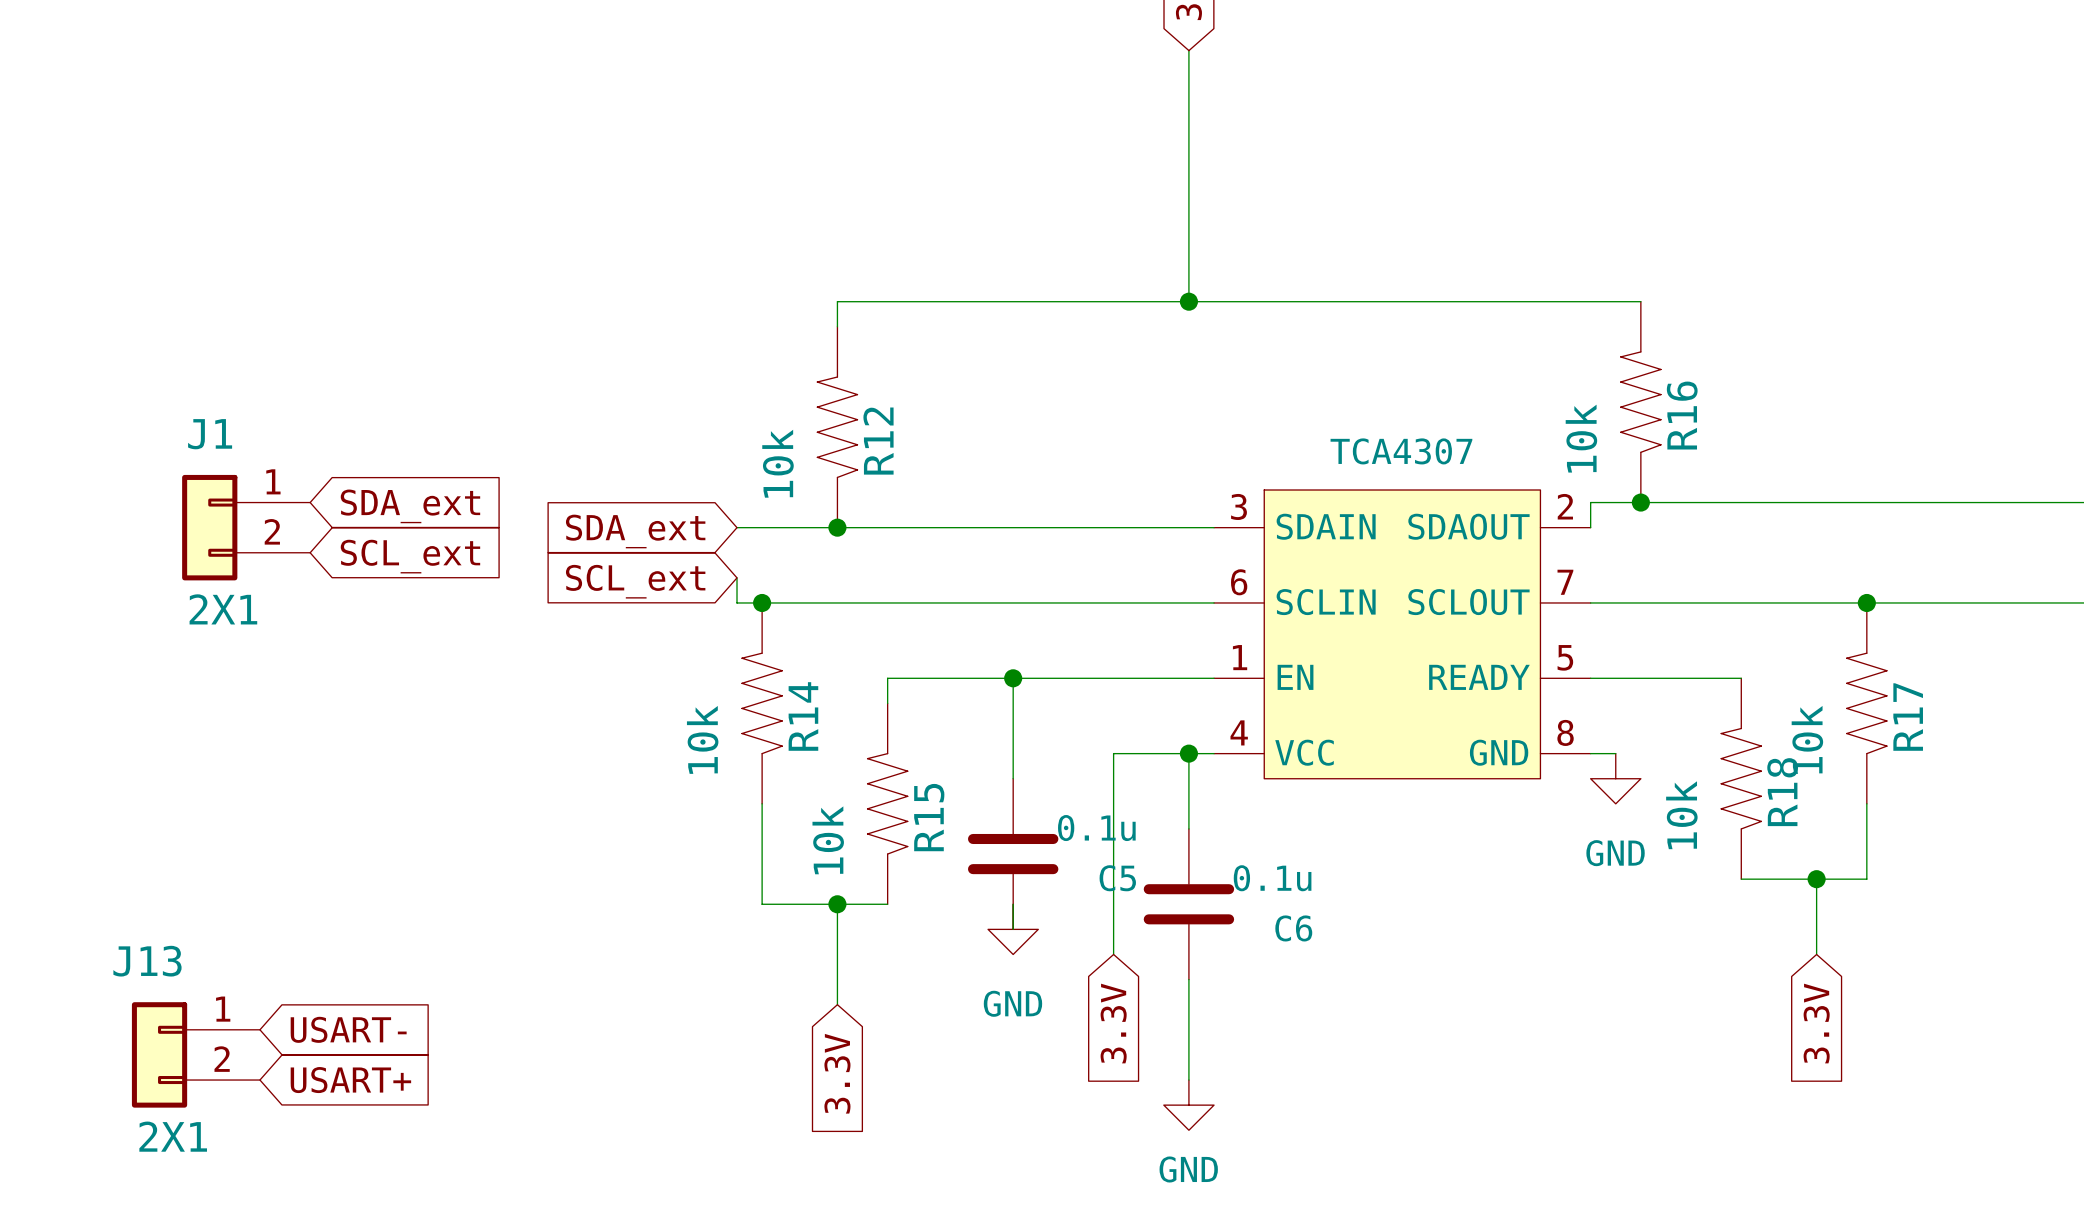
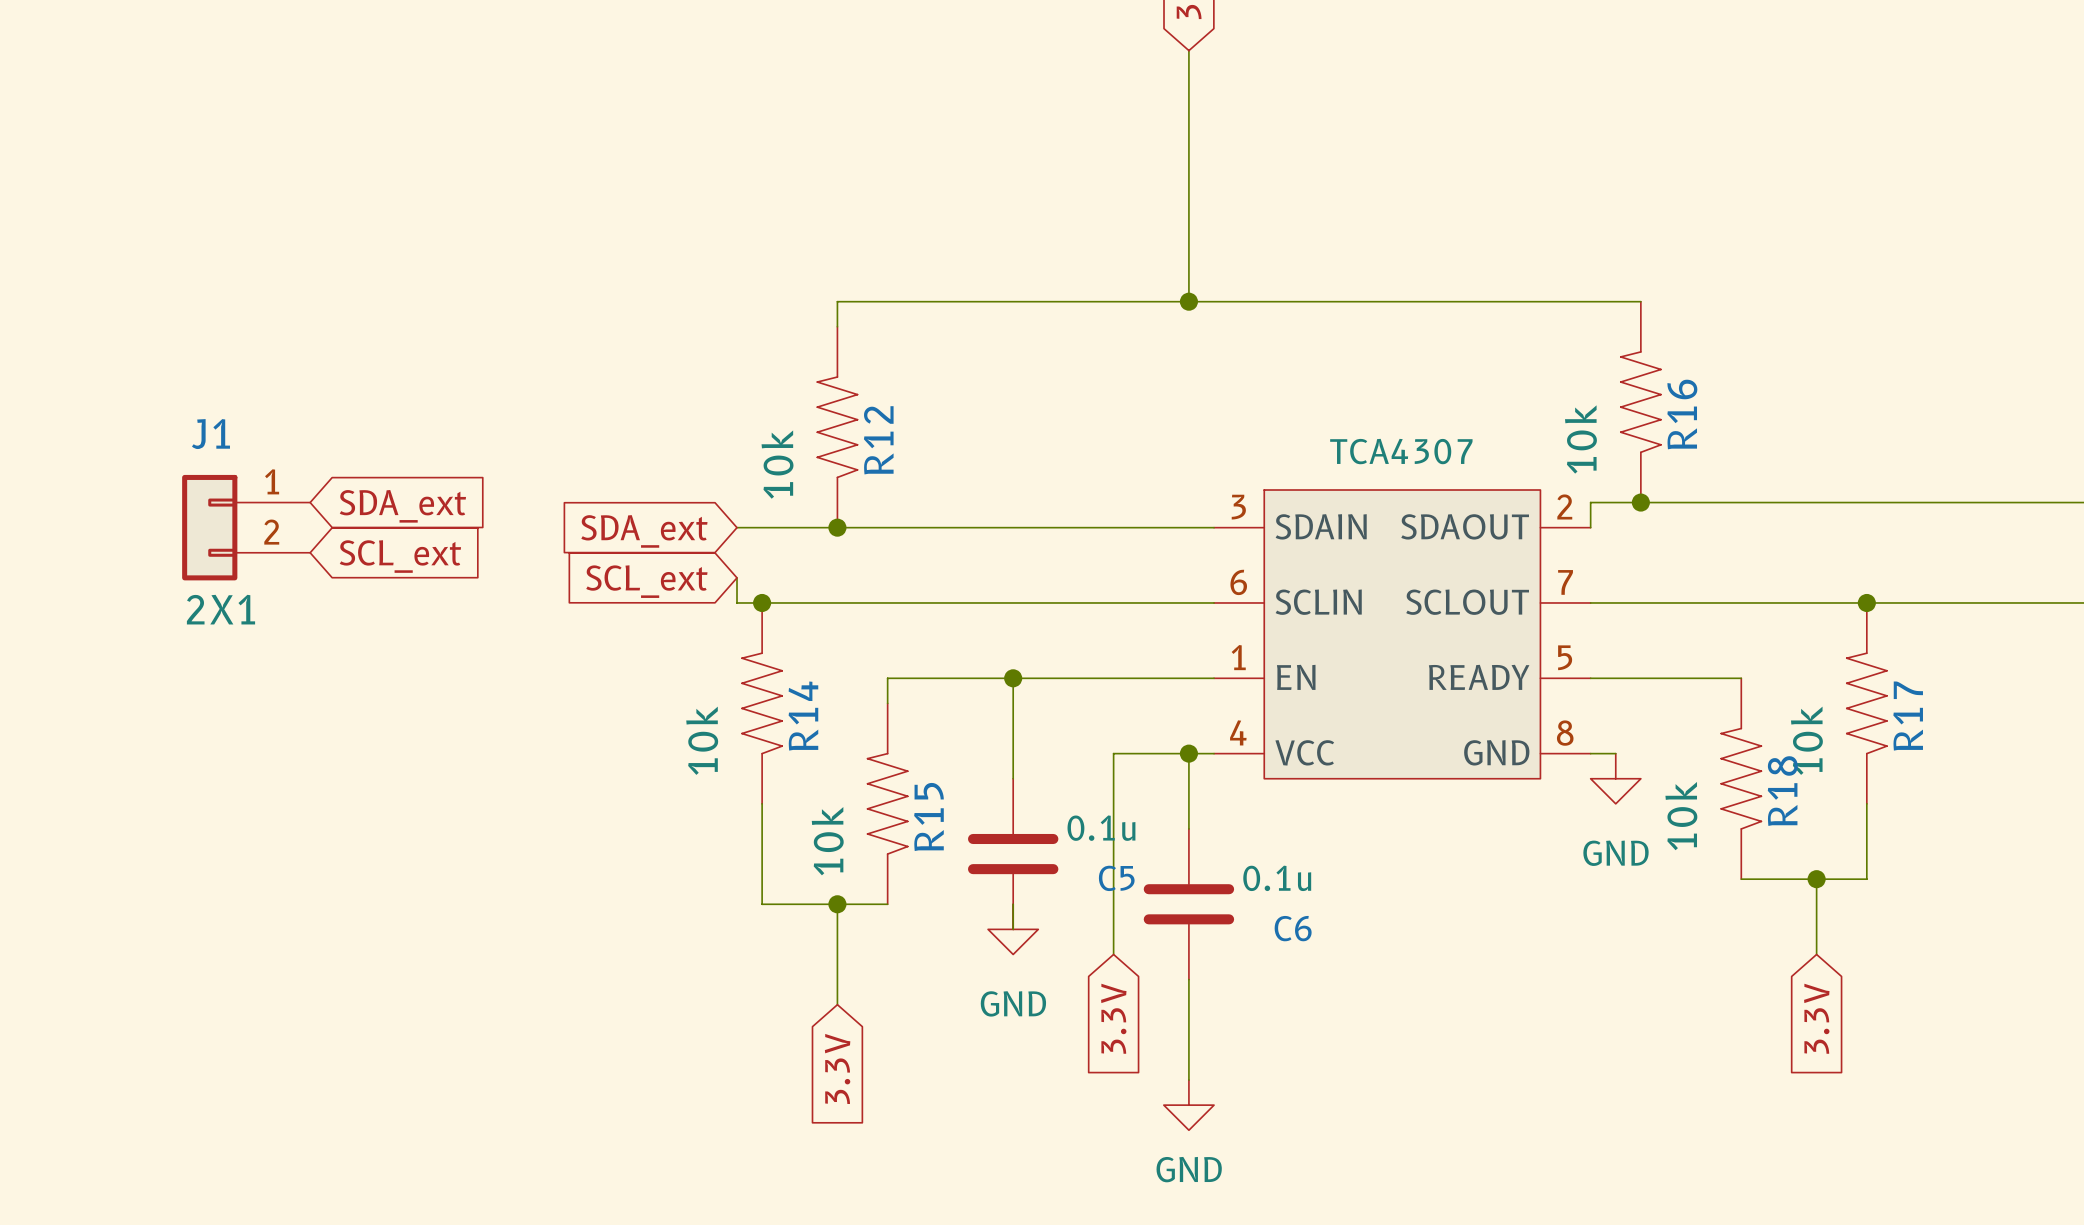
global label: USART- (348, 1029) -> none
J13: 2X1 (195, 1054) -> none
global label: USART+ (350, 1080) -> none

